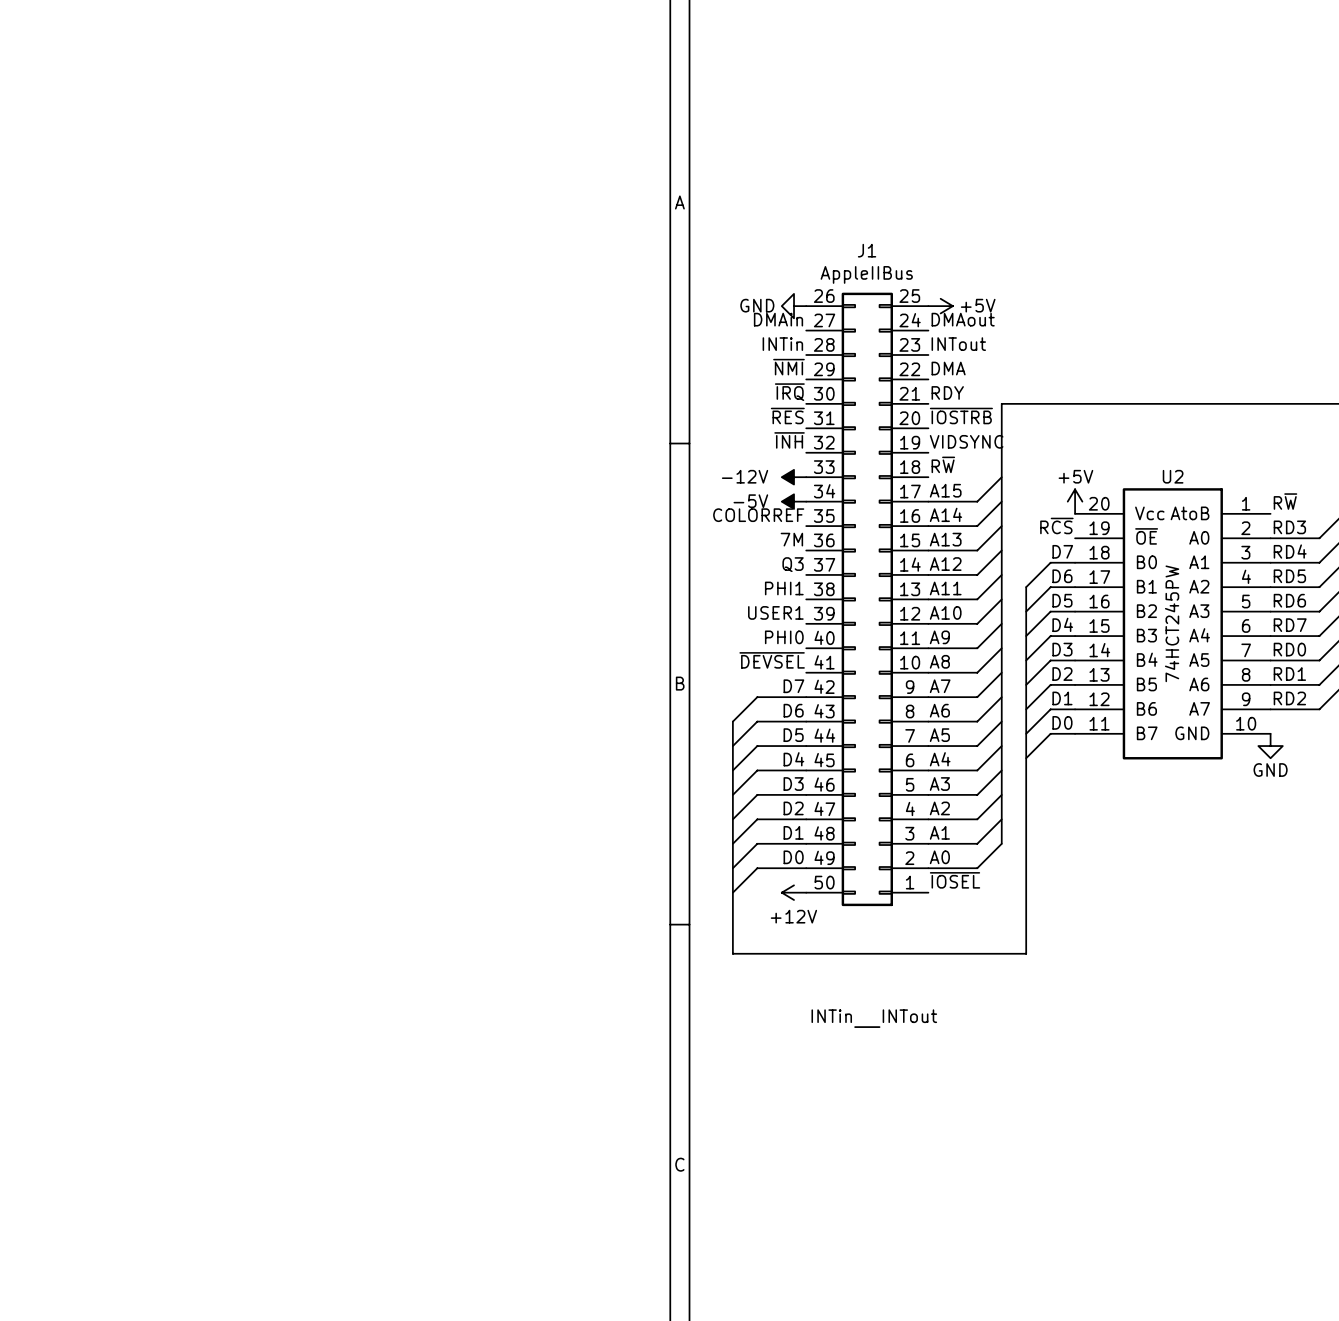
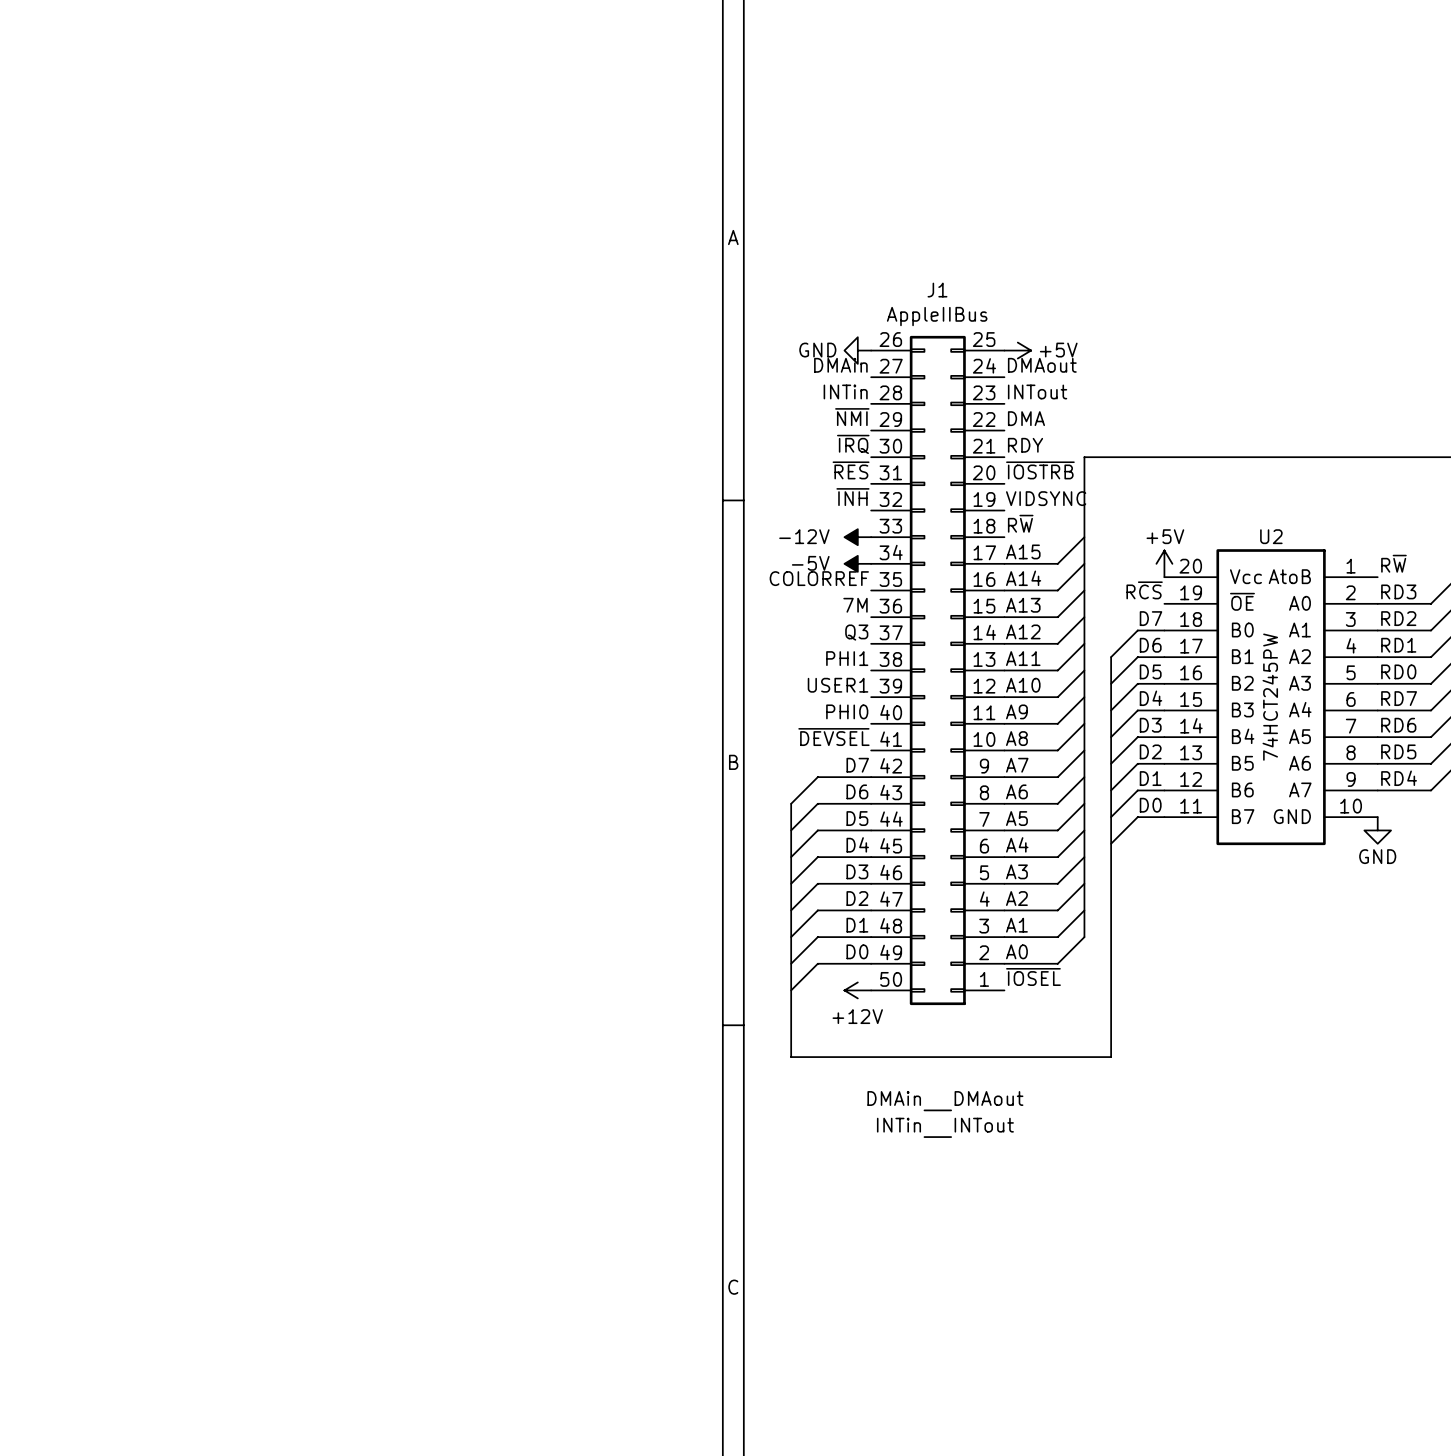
label: RD4 (1290, 551) -> RD2 (1398, 618)
label: RD5 (1289, 576) -> RD1 (1398, 645)
label: RD6 (1289, 600) -> RD0 (1398, 671)
label: RD0 (1289, 649) -> RD6 (1398, 725)
label: RD1 (1289, 674) -> RD5 (1398, 751)
label: RD2 (1289, 698) -> RD4 (1399, 778)
label: none -> DMAin (894, 1098)
label: none -> DMAout (989, 1098)
wire: none -> (924, 1110) (951, 1110)

